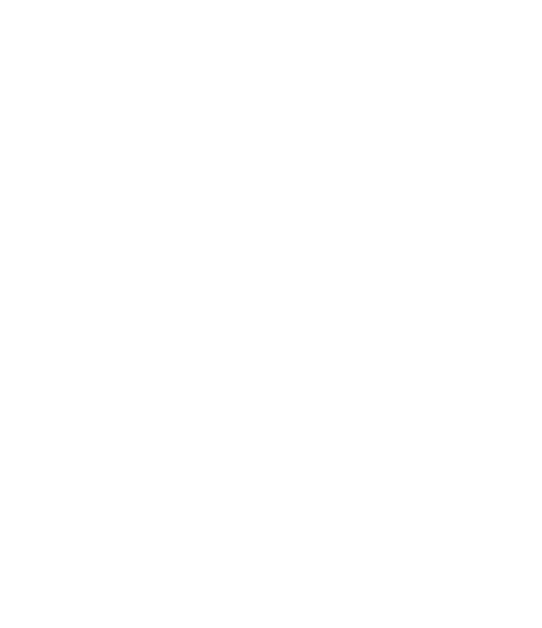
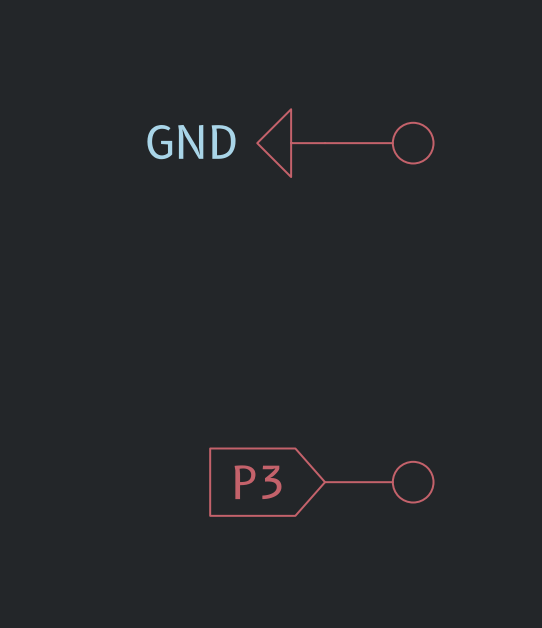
power symbol: none -> GND (291, 143)
part: none -> (379, 143)
global label: none -> P3 (258, 482)
part: none -> (379, 482)

